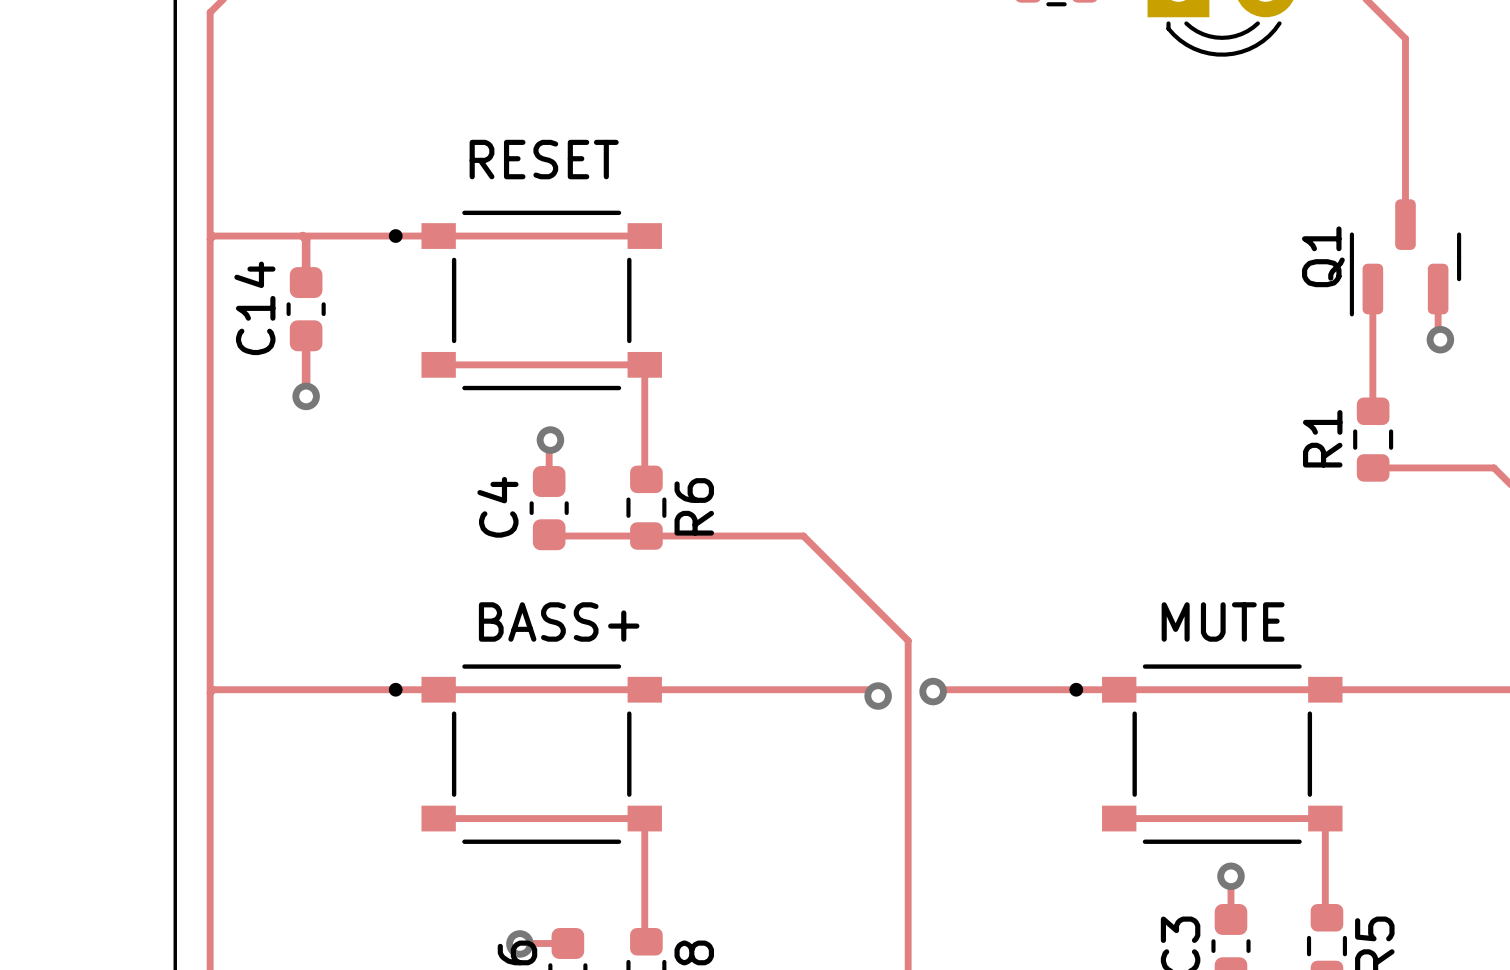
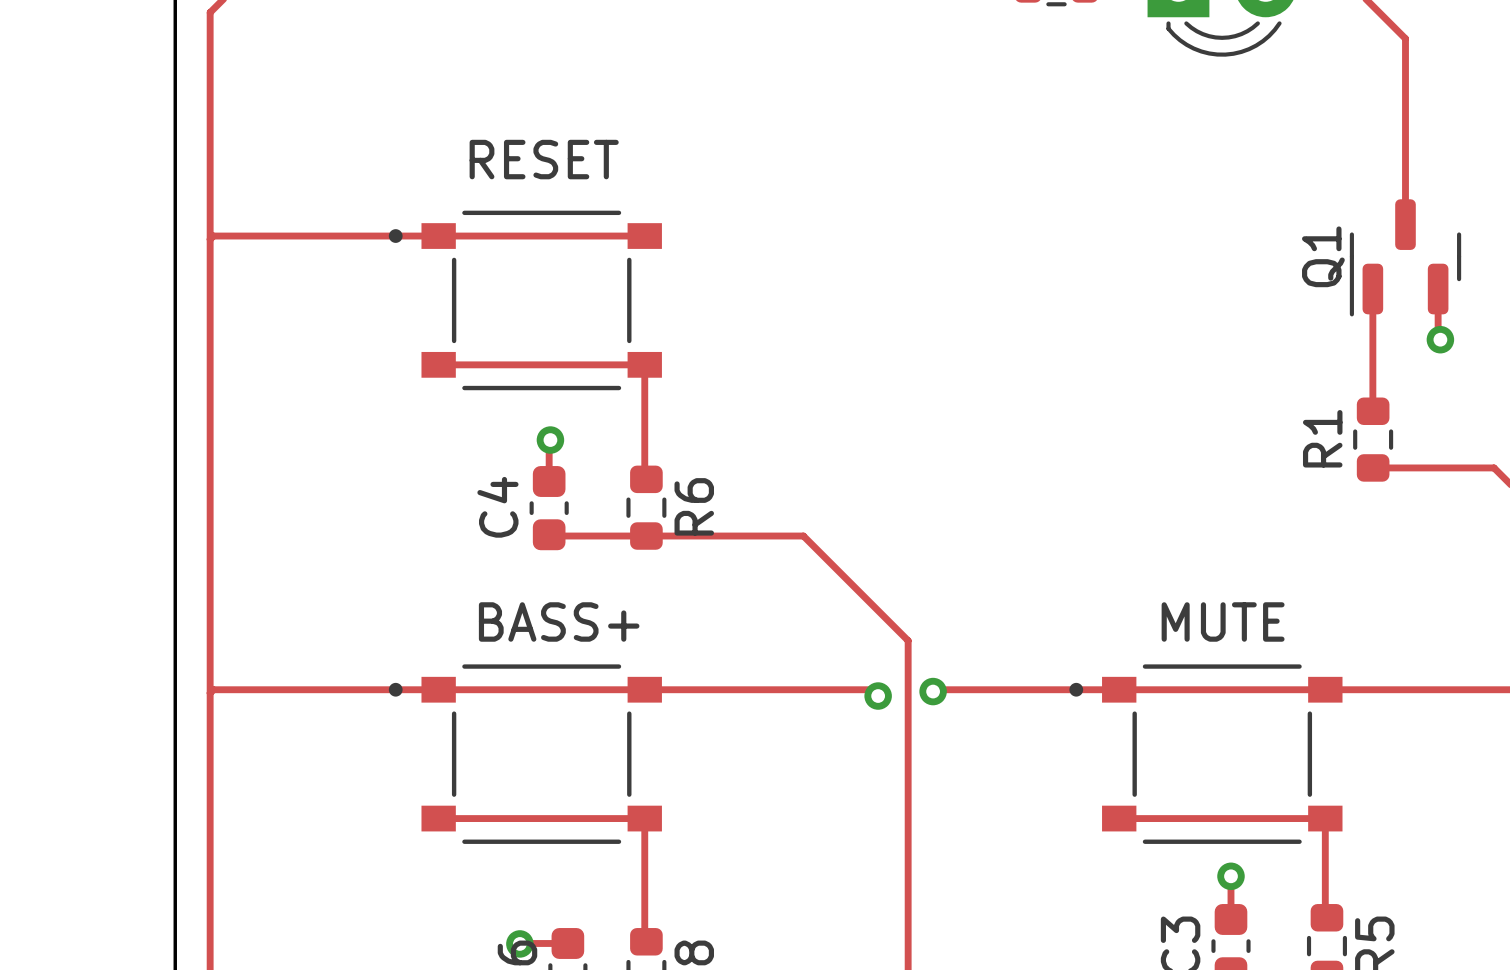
track: (302, 236) (306, 239) (306, 282) -> none
C14: (306, 309) -> none
track: (306, 335) (306, 396) -> none
via: (306, 396) -> none

